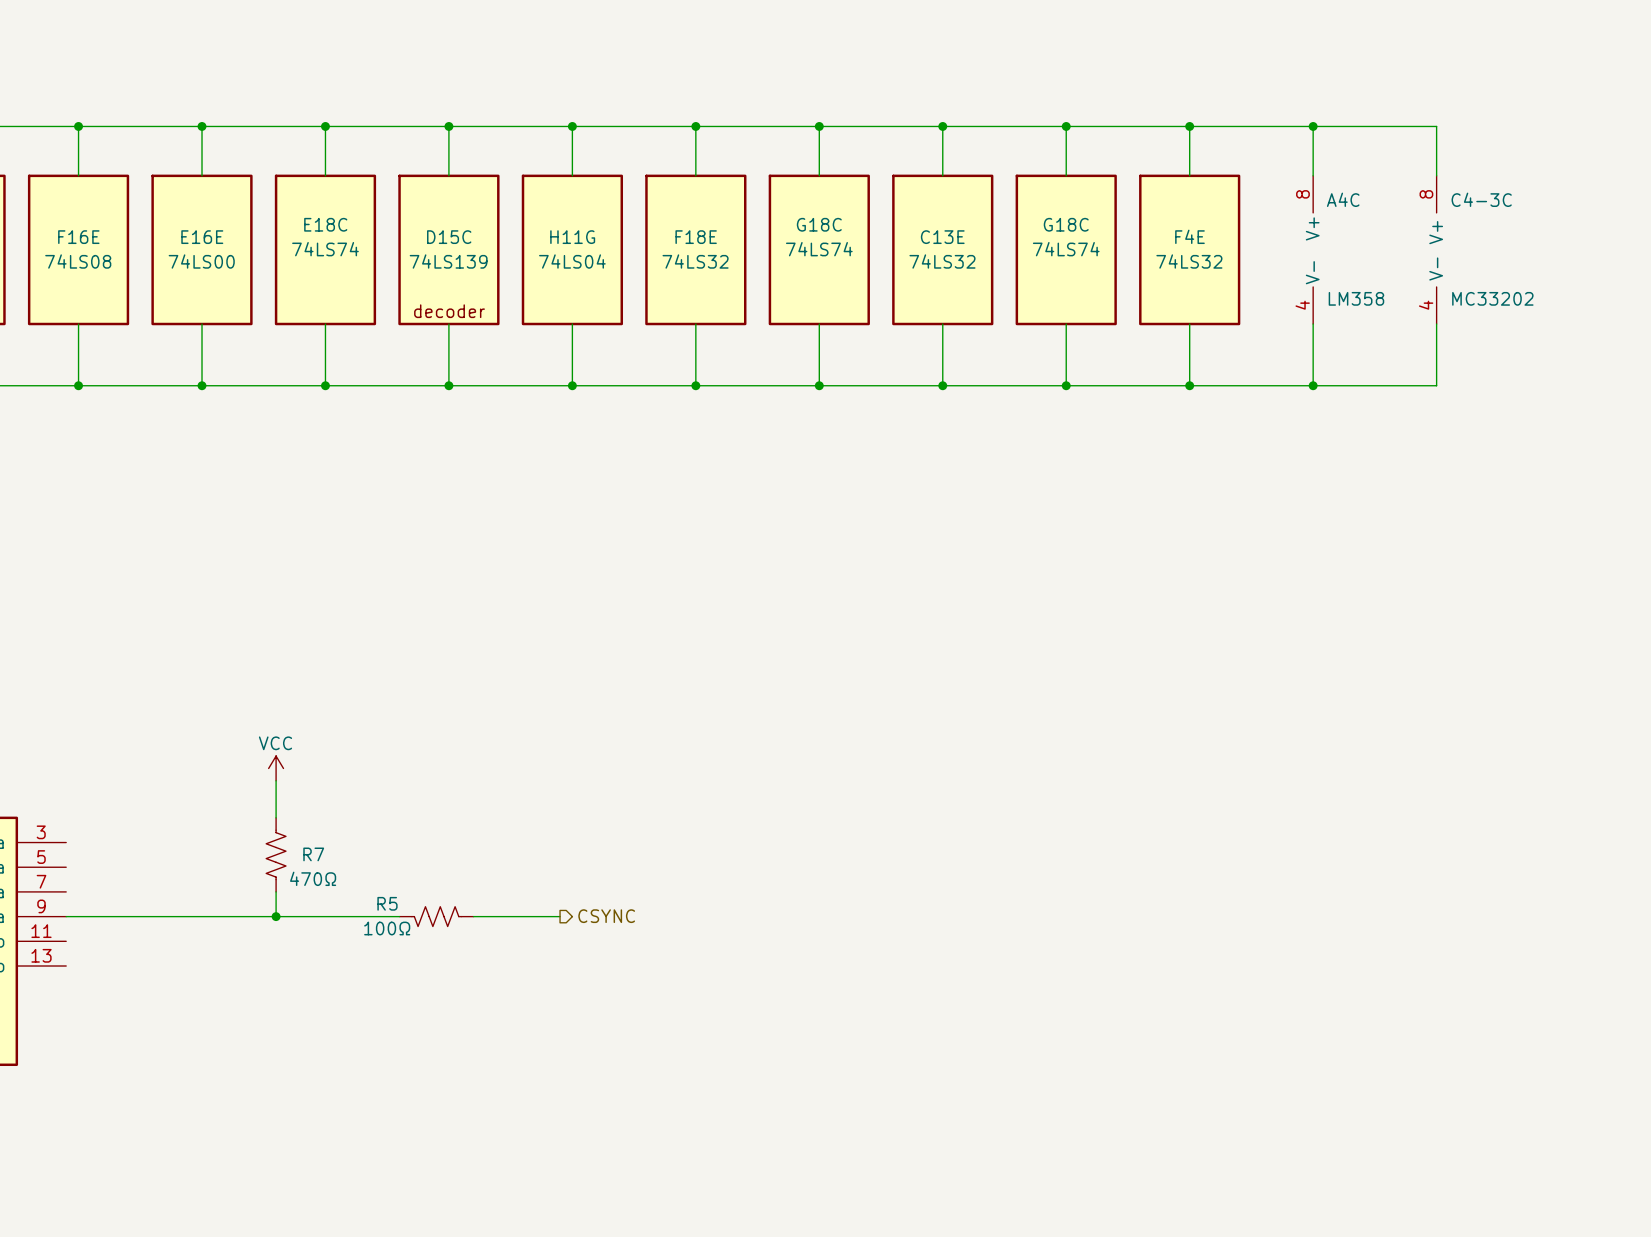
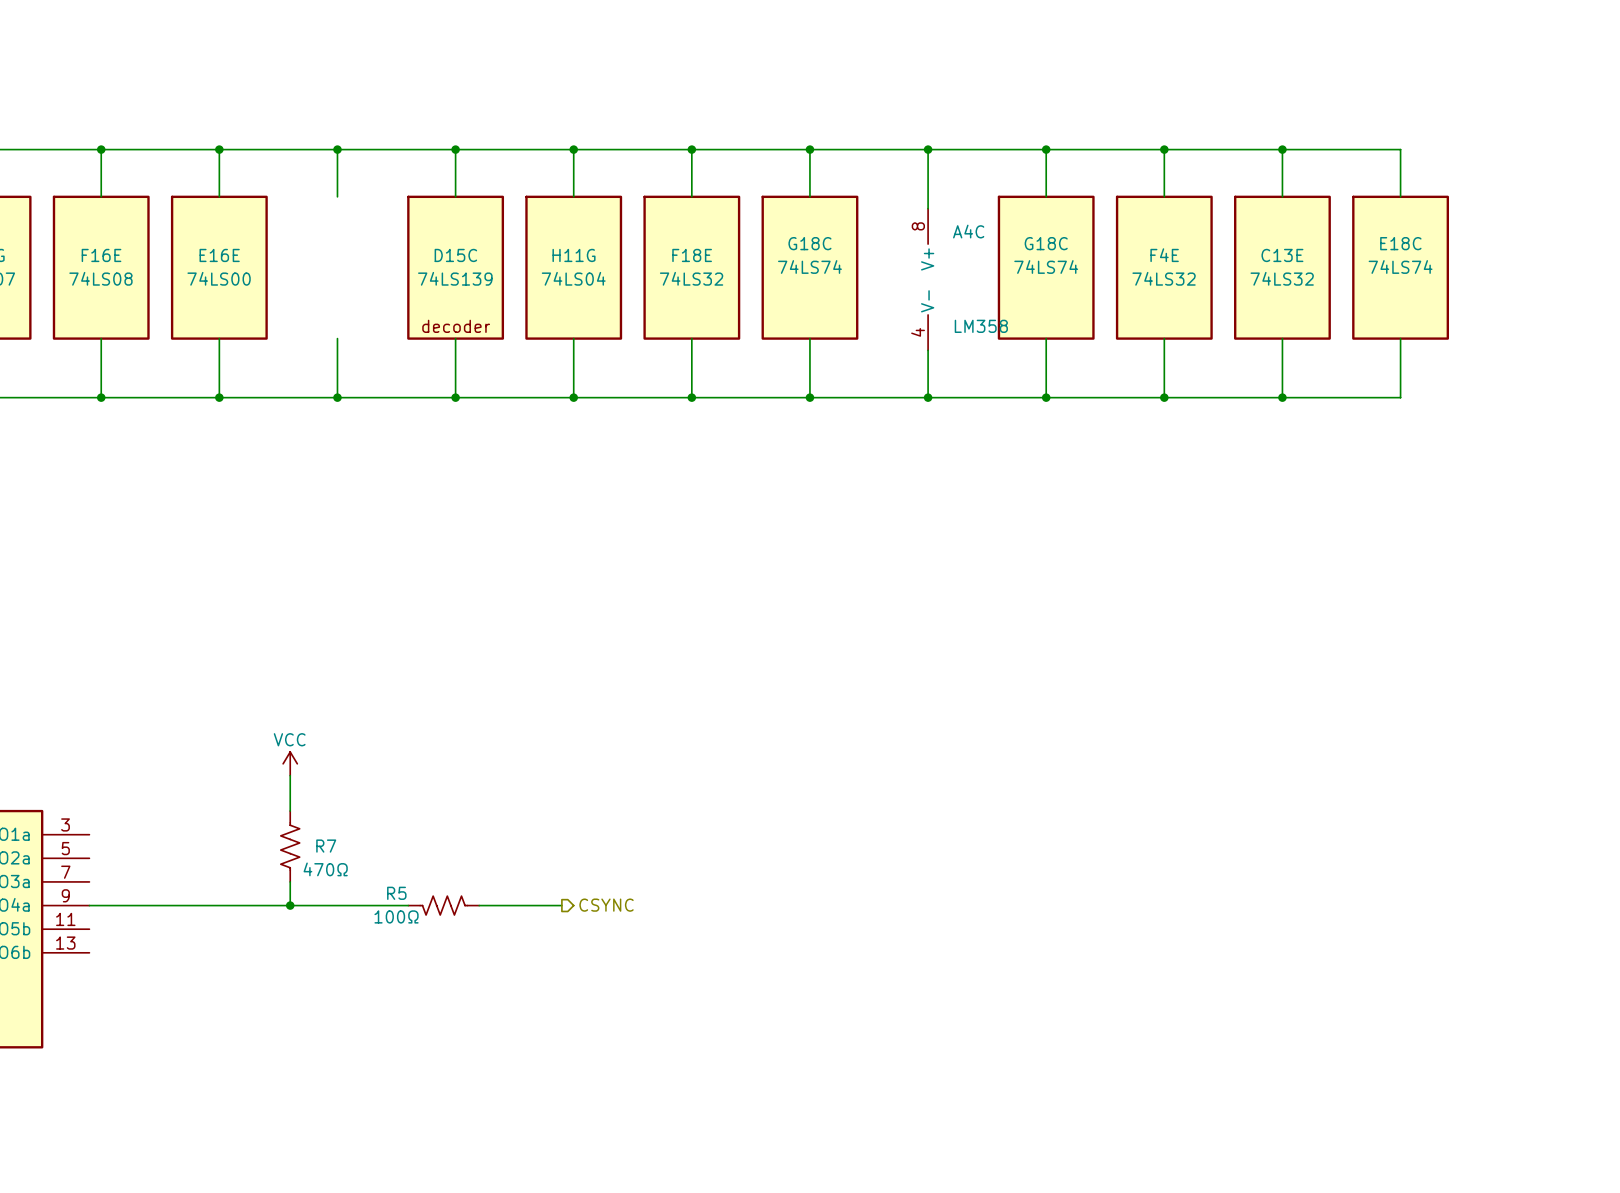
A4C name position: A4C (1343, 199) -> A4C (968, 231)
E18C position: (325, 249) -> (1400, 267)
C13E position: (942, 249) -> (1282, 267)
A4C position: (1313, 249) -> (928, 279)
C4-3C: MC33202 (1436, 249) -> none
A4C value position: LM358 (1356, 298) -> LM358 (981, 326)

